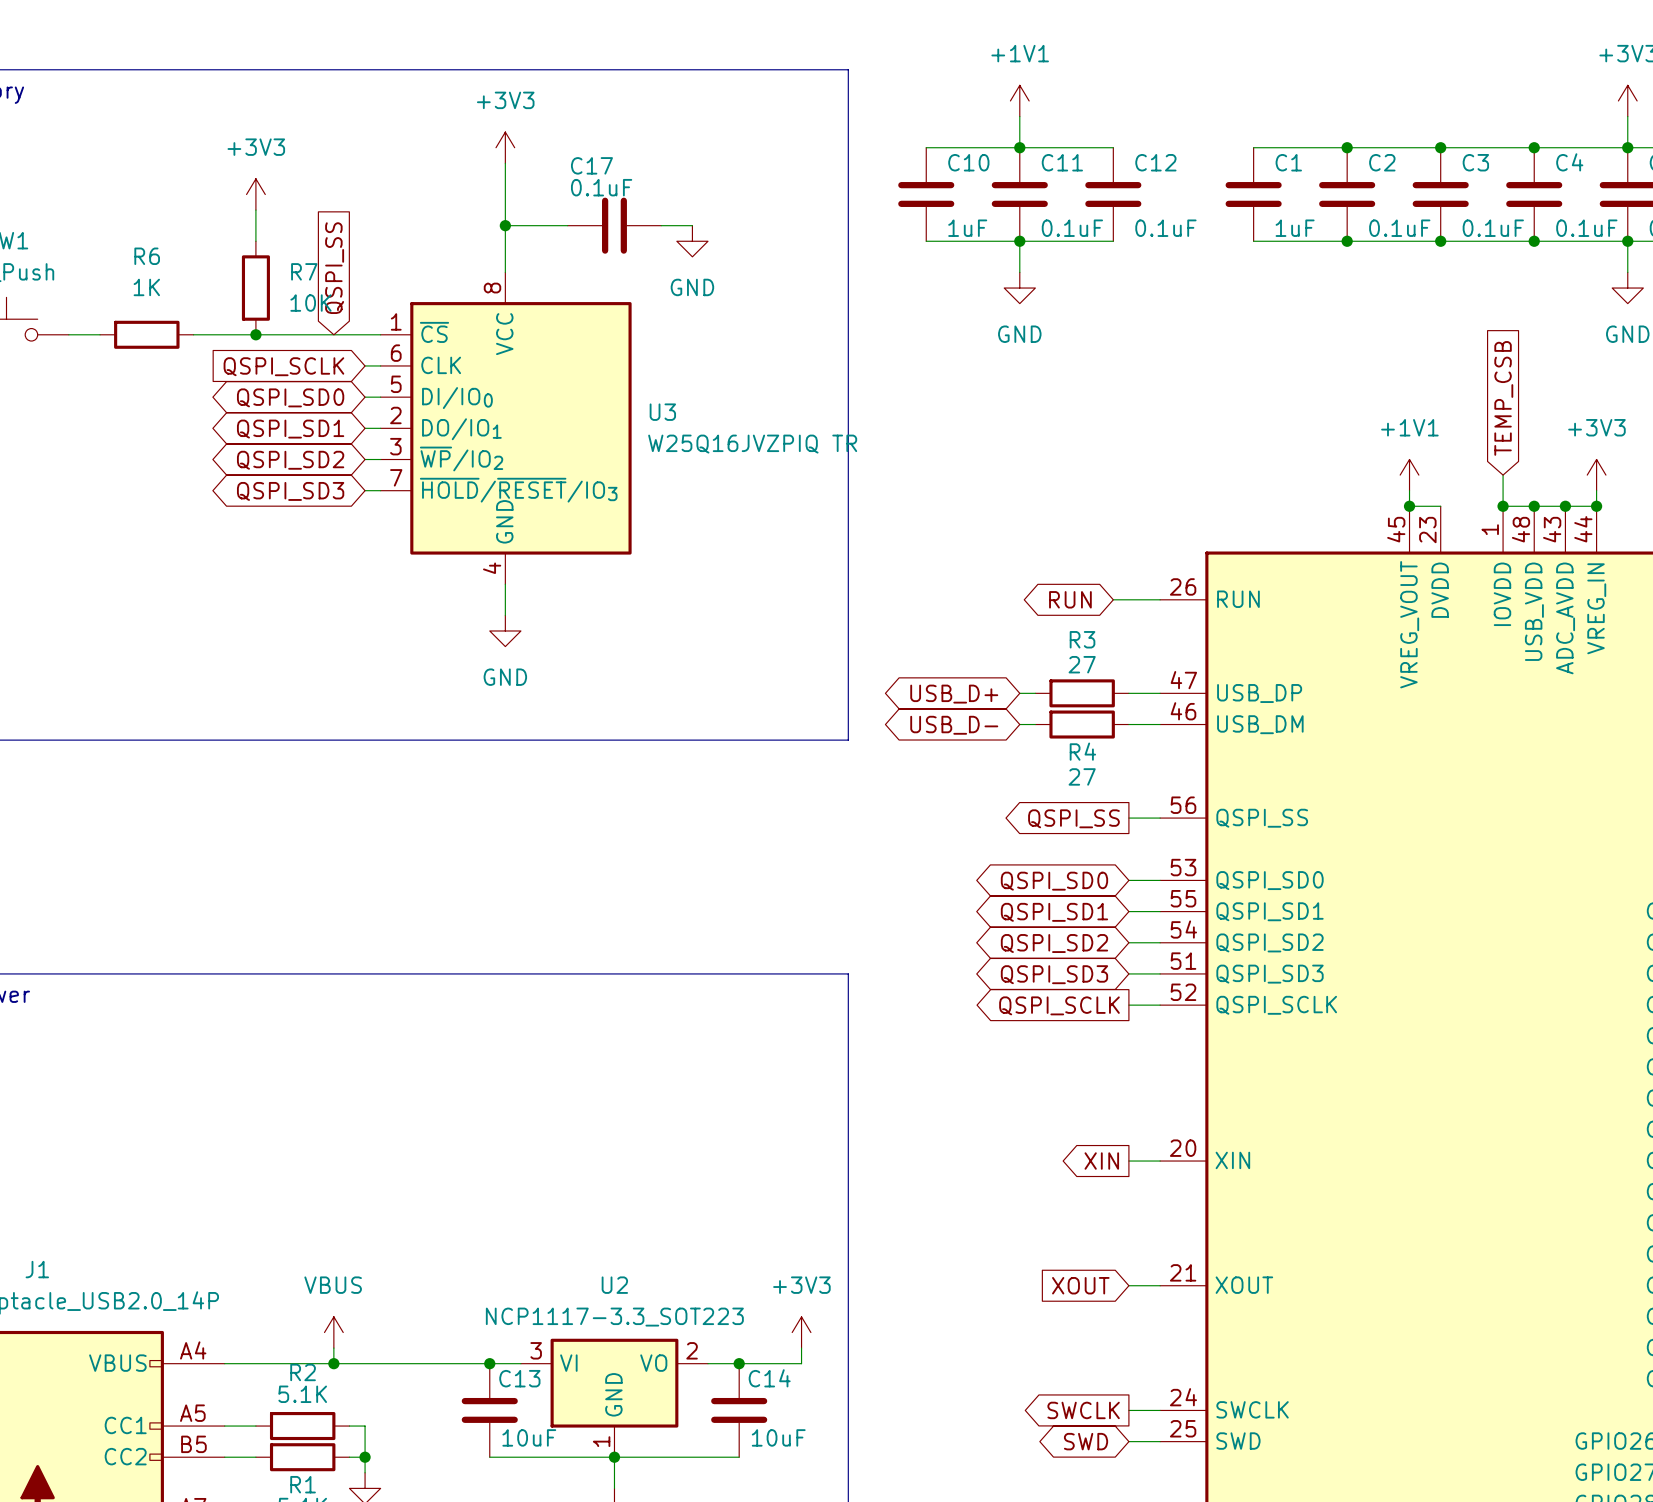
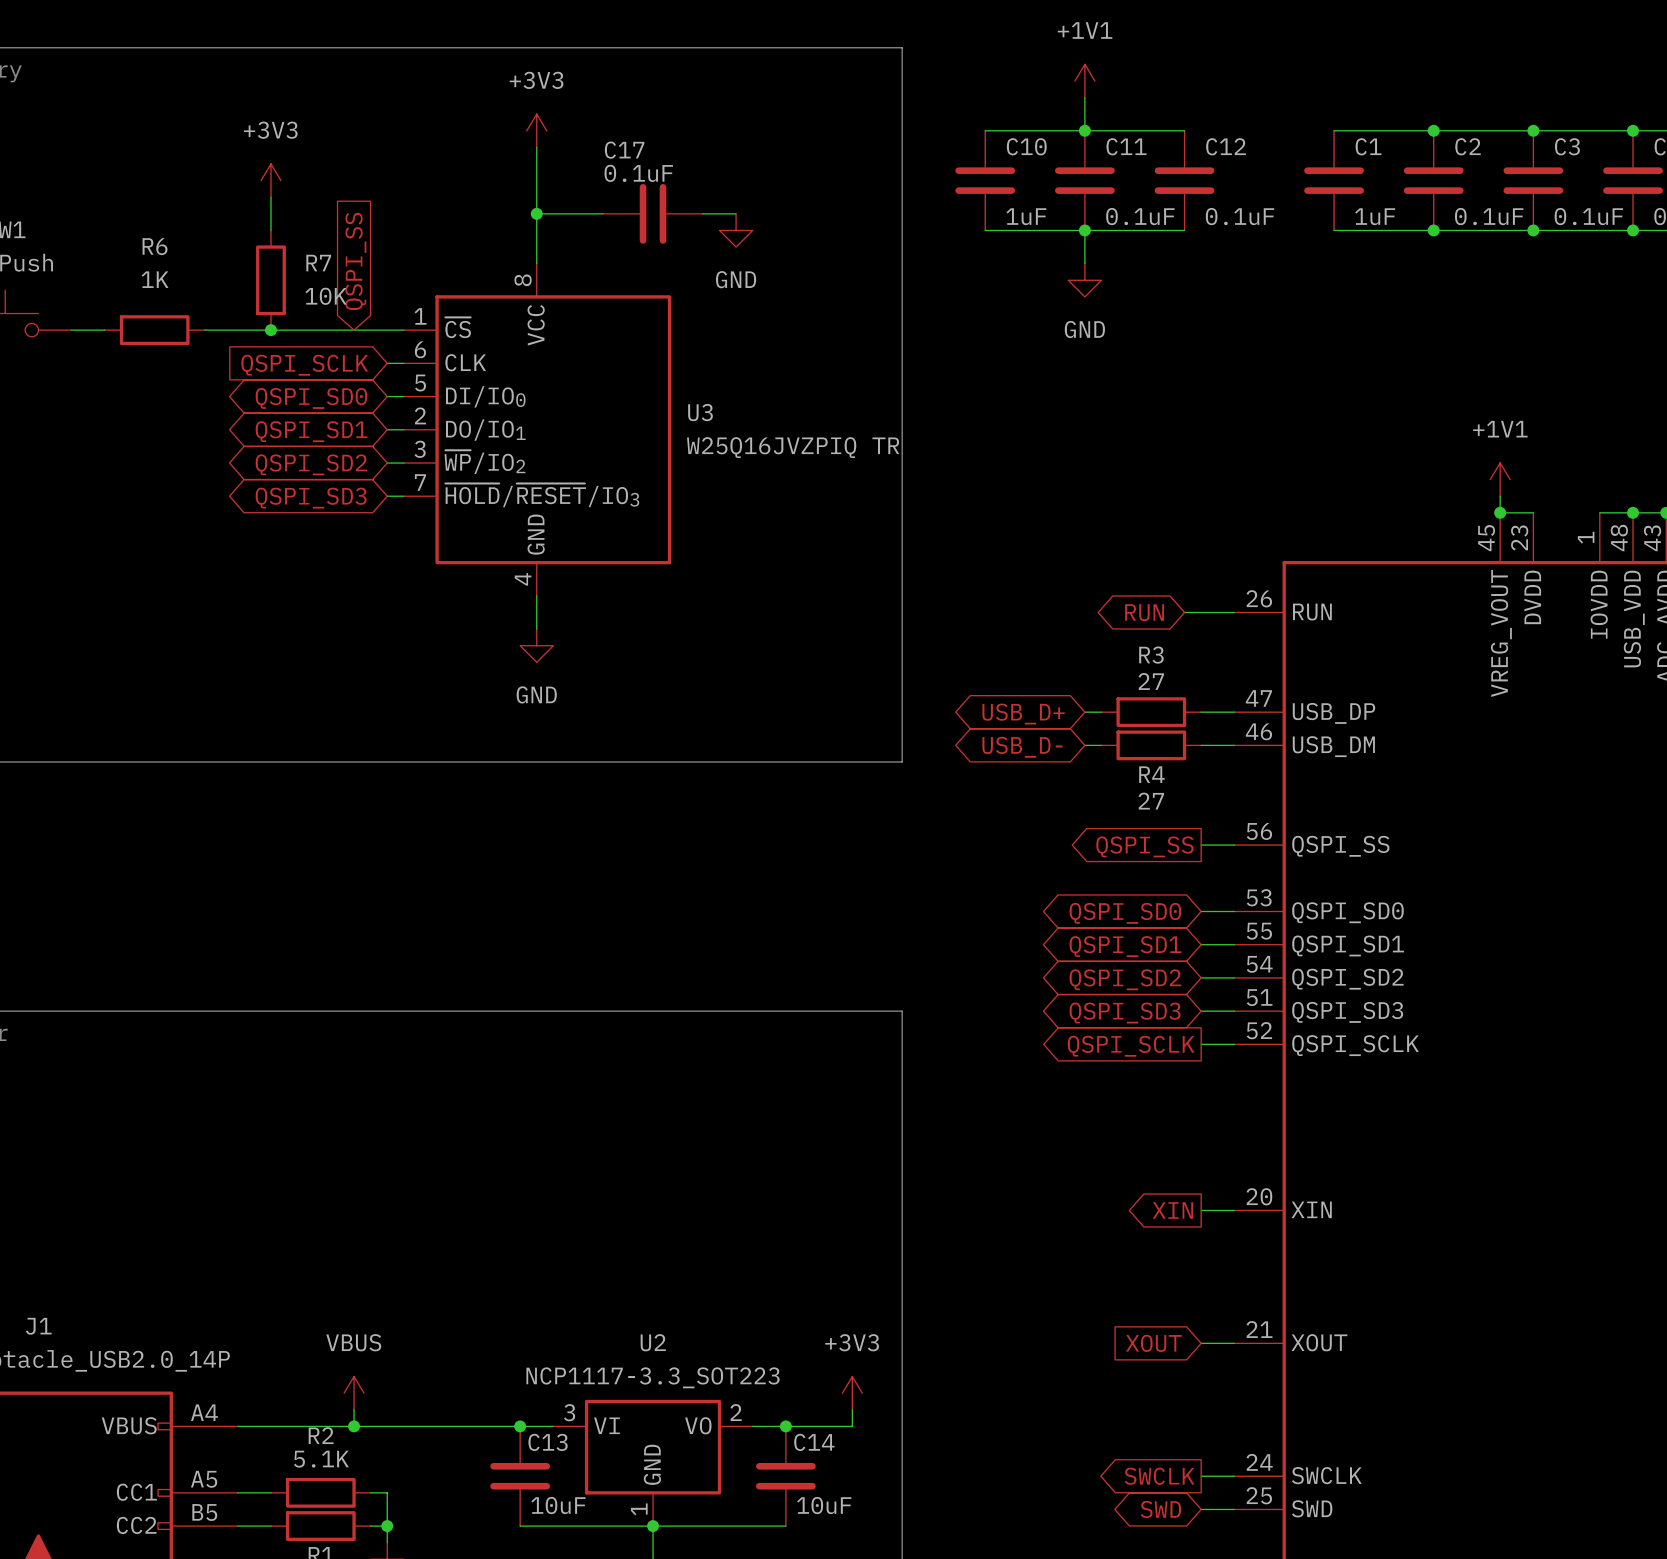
global label: TEMP_CSB (1503, 398) -> none
wire: (1503, 475) (1503, 506) -> none
junction: (1503, 506) -> none

